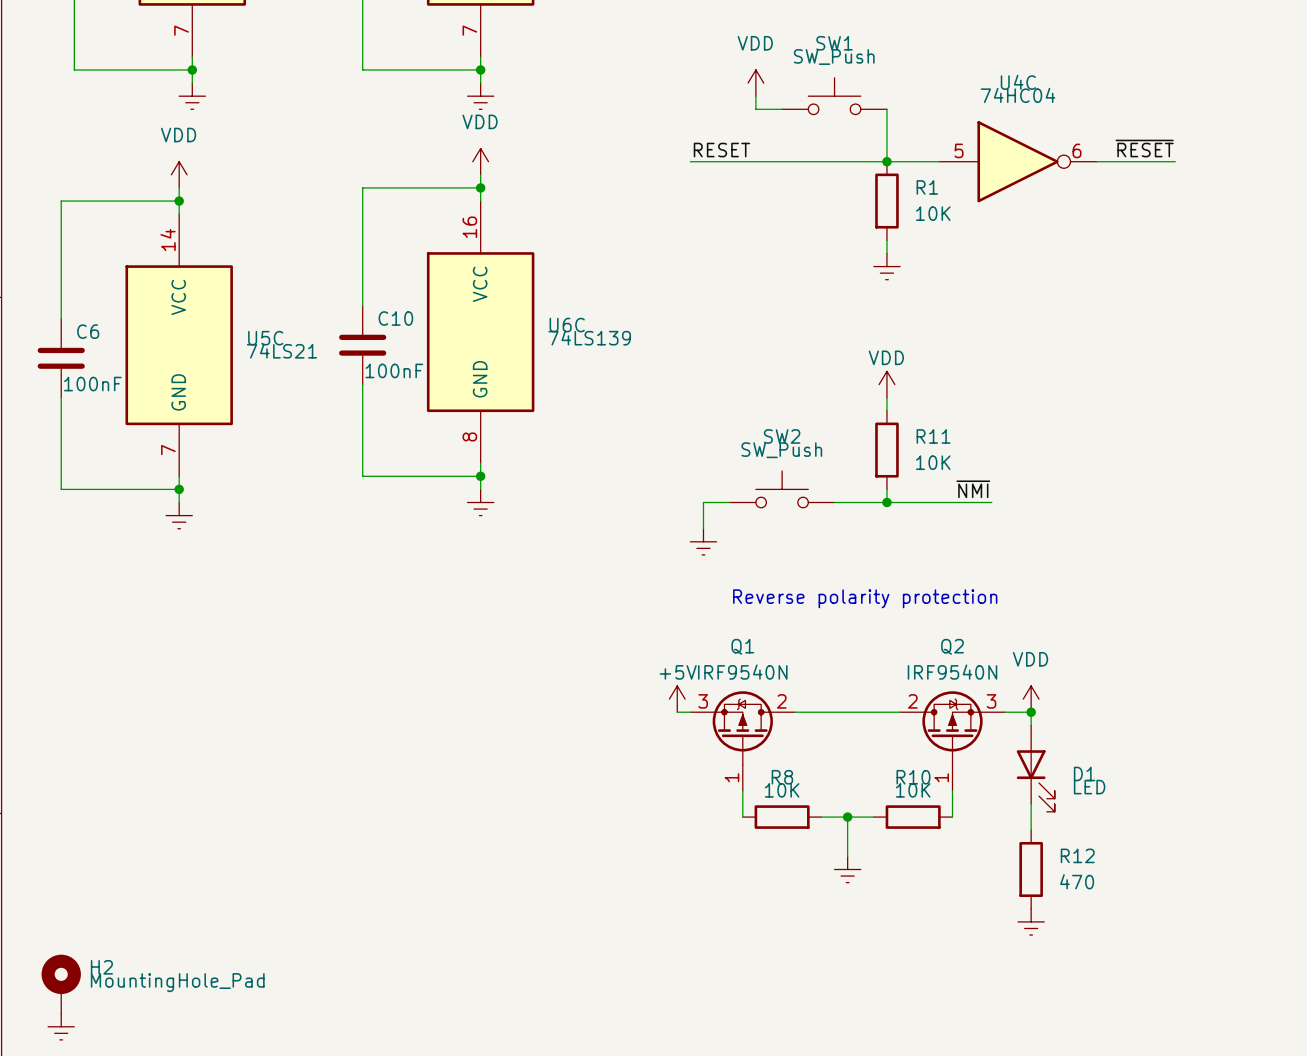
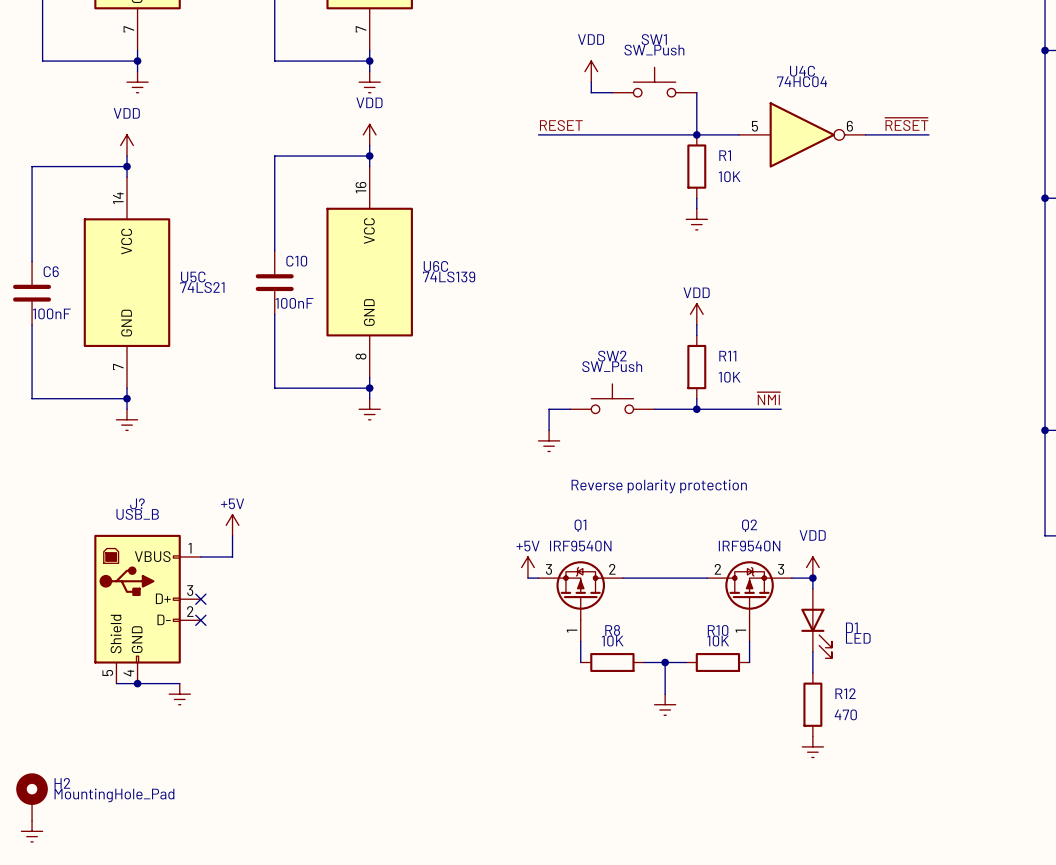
power symbol: none -> +5V (232, 525)
wire: none -> (232, 535) (232, 556) (200, 556)
no-connect mark: none -> (200, 599)
J?: none -> USB_B (147, 609)
no-connect mark: none -> (200, 620)
wire: none -> (116, 683) (179, 683)
junction: none -> (137, 683)
power symbol: none -> (179, 694)

